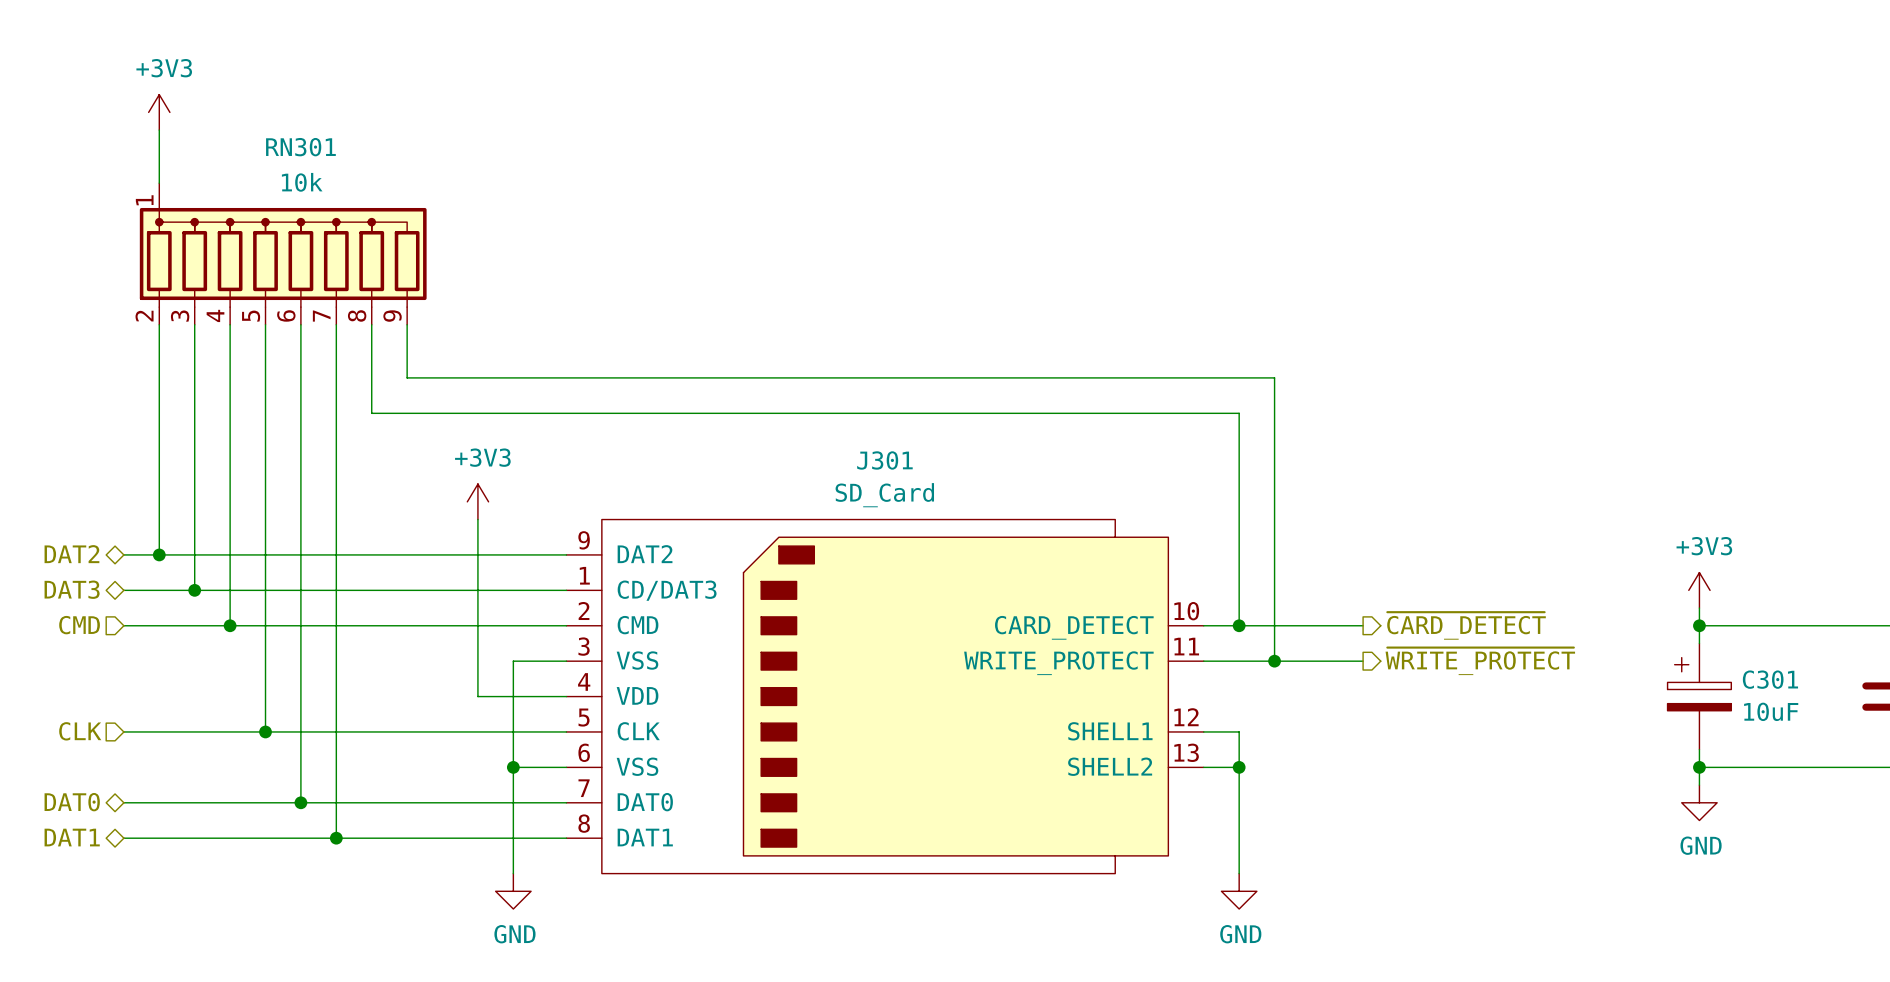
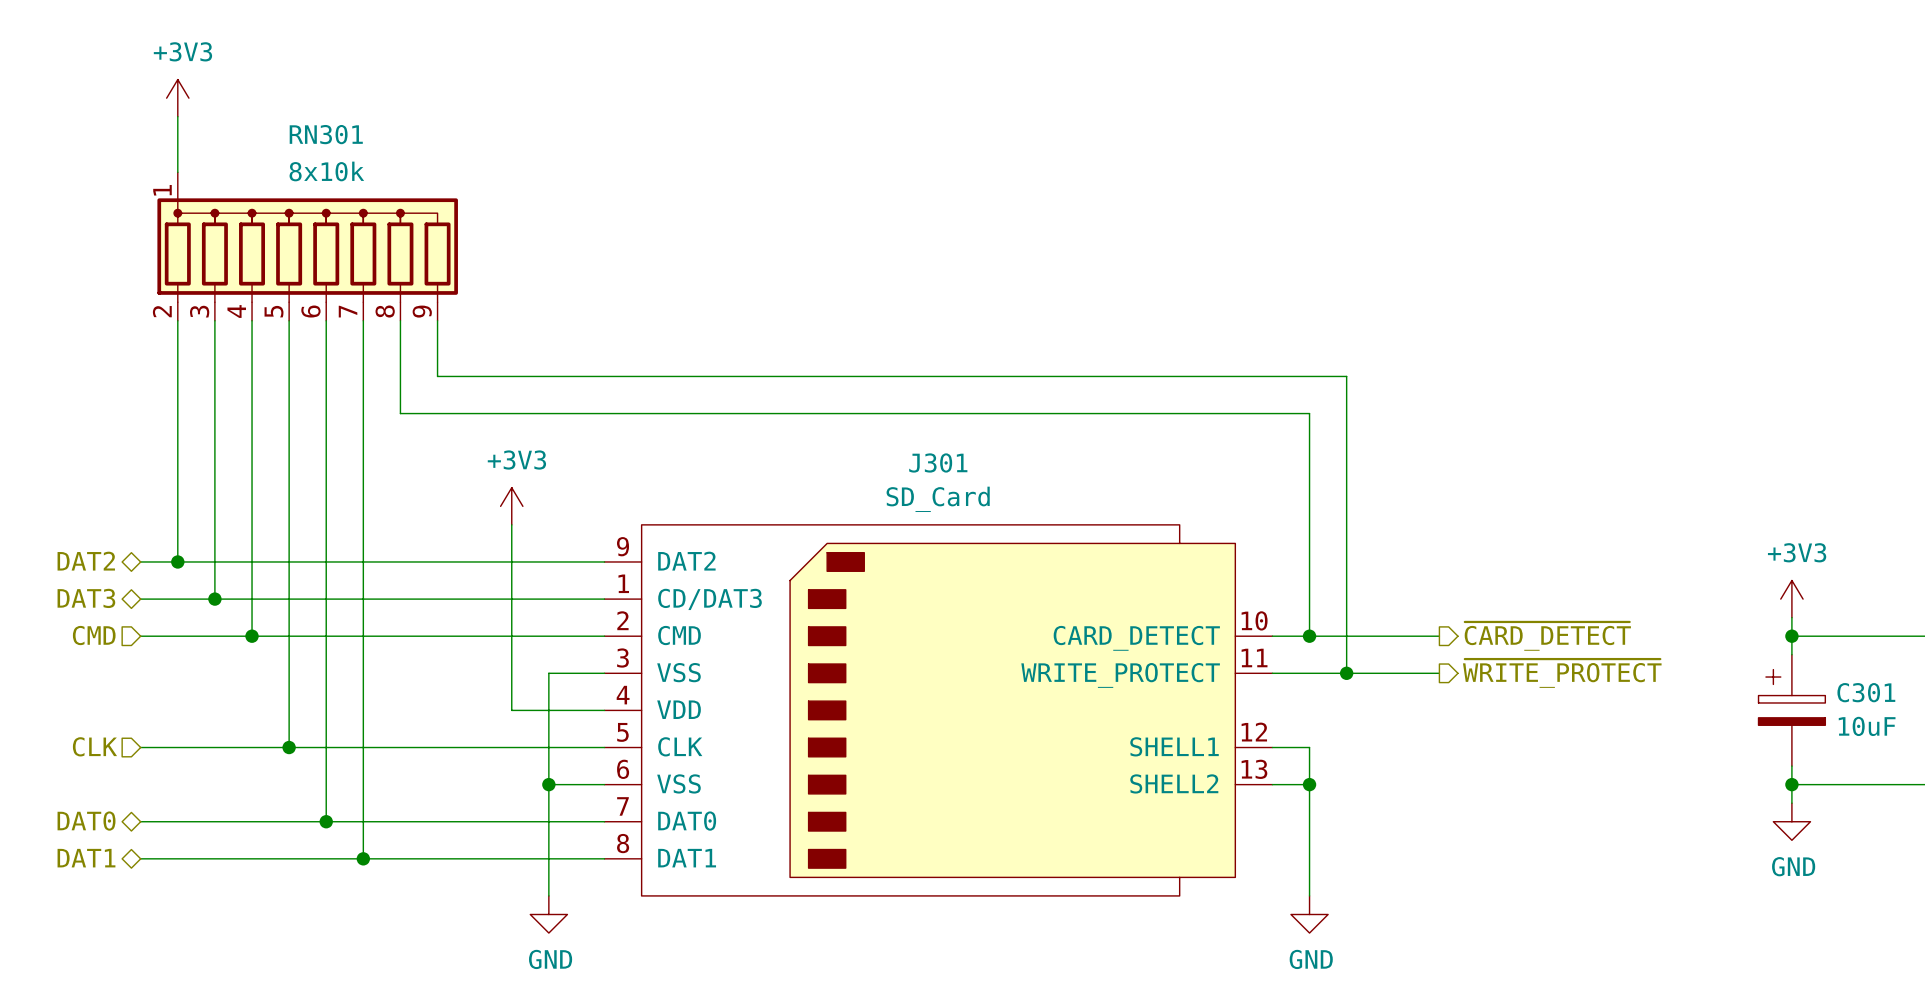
RN301 value: 10k (302, 182) -> 8x10k (326, 171)

